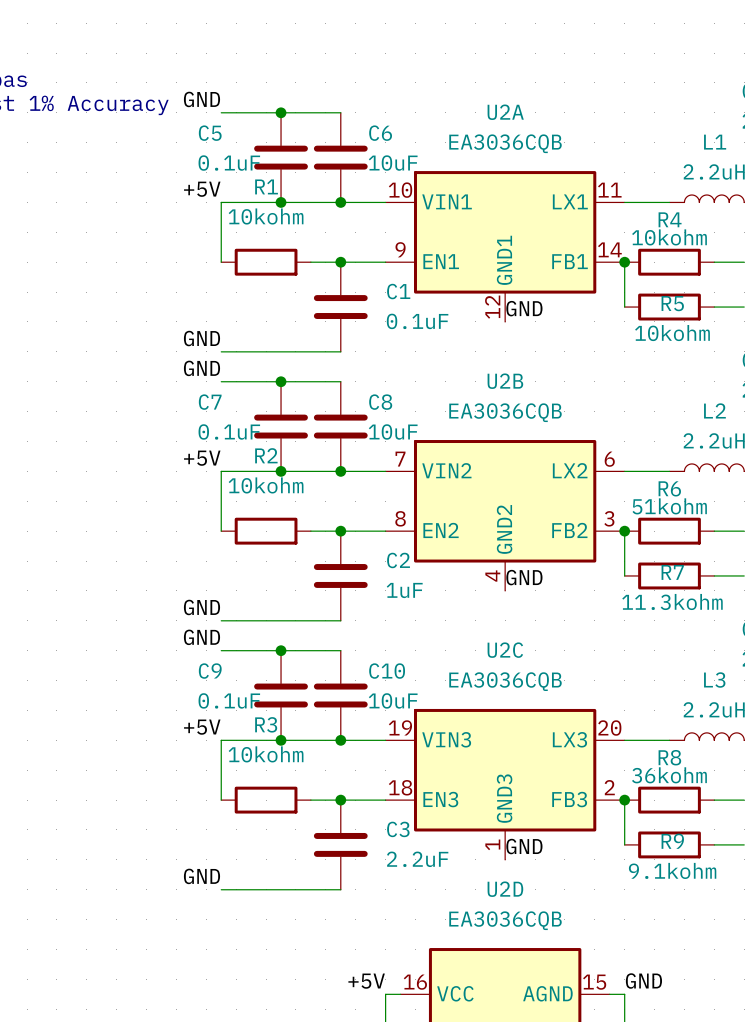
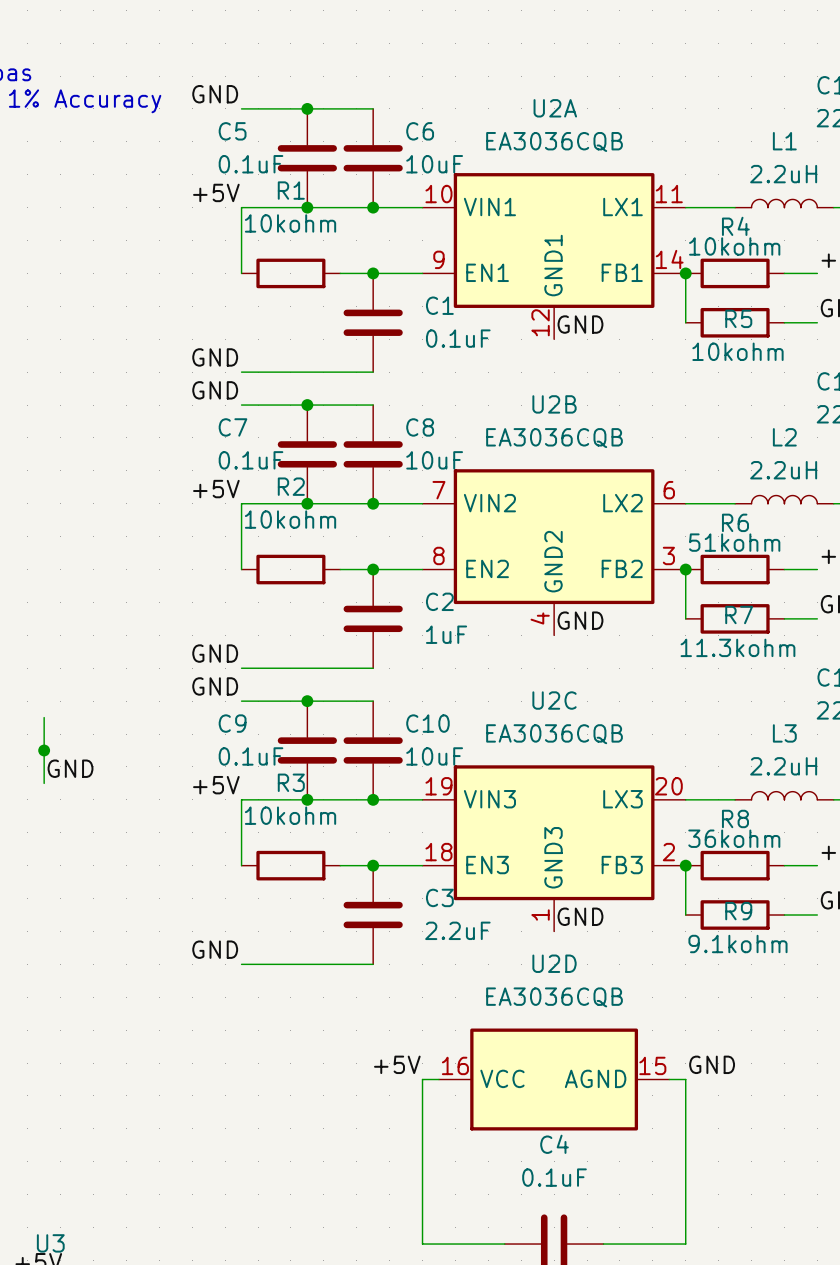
wire: none -> (44, 717) (44, 783)
junction: none -> (44, 750)
label: none -> GND (70, 768)

